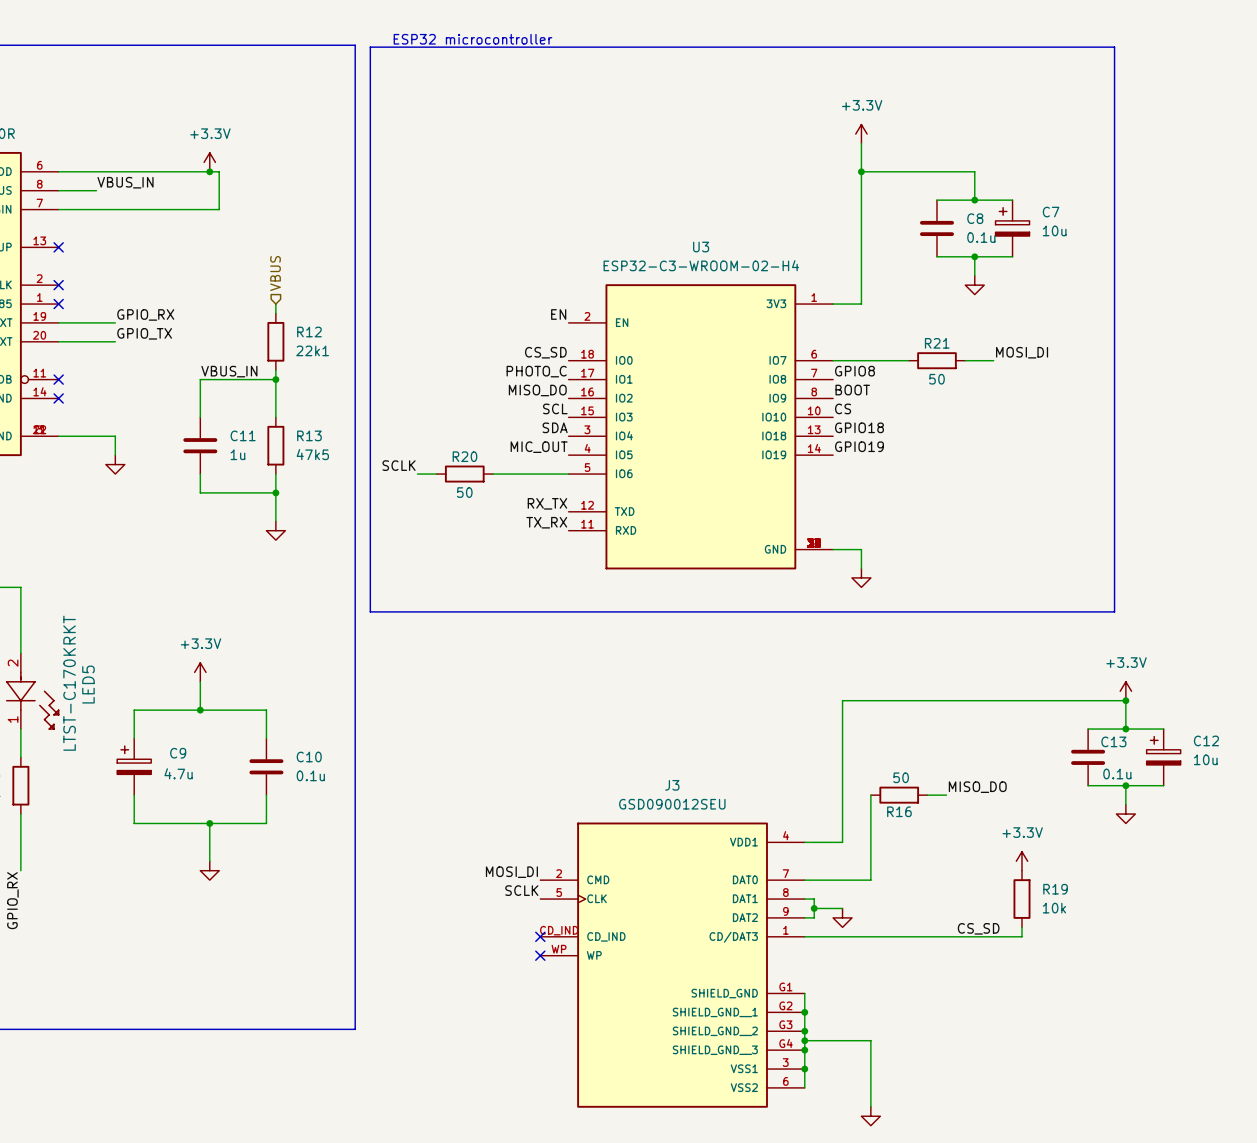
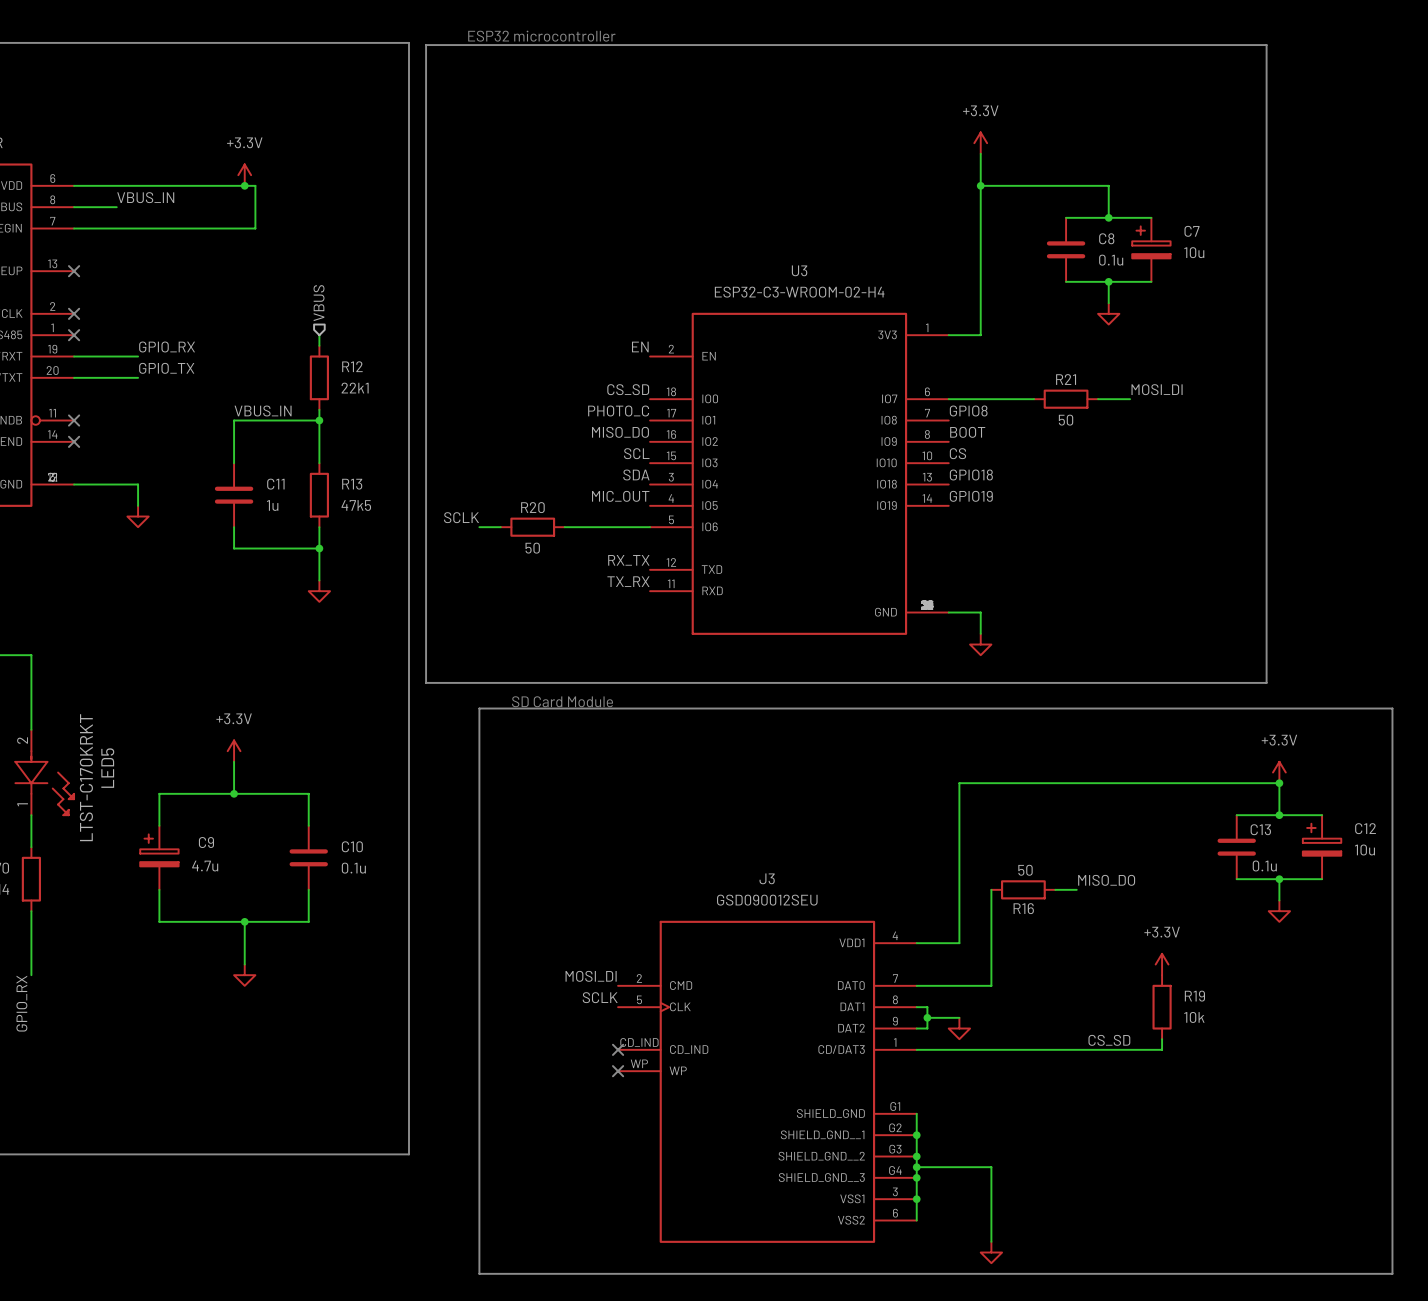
text: none -> SD Card Module (562, 701)
line: none -> (479, 708) (1392, 708) (1392, 1273) (479, 1273) (479, 708)

